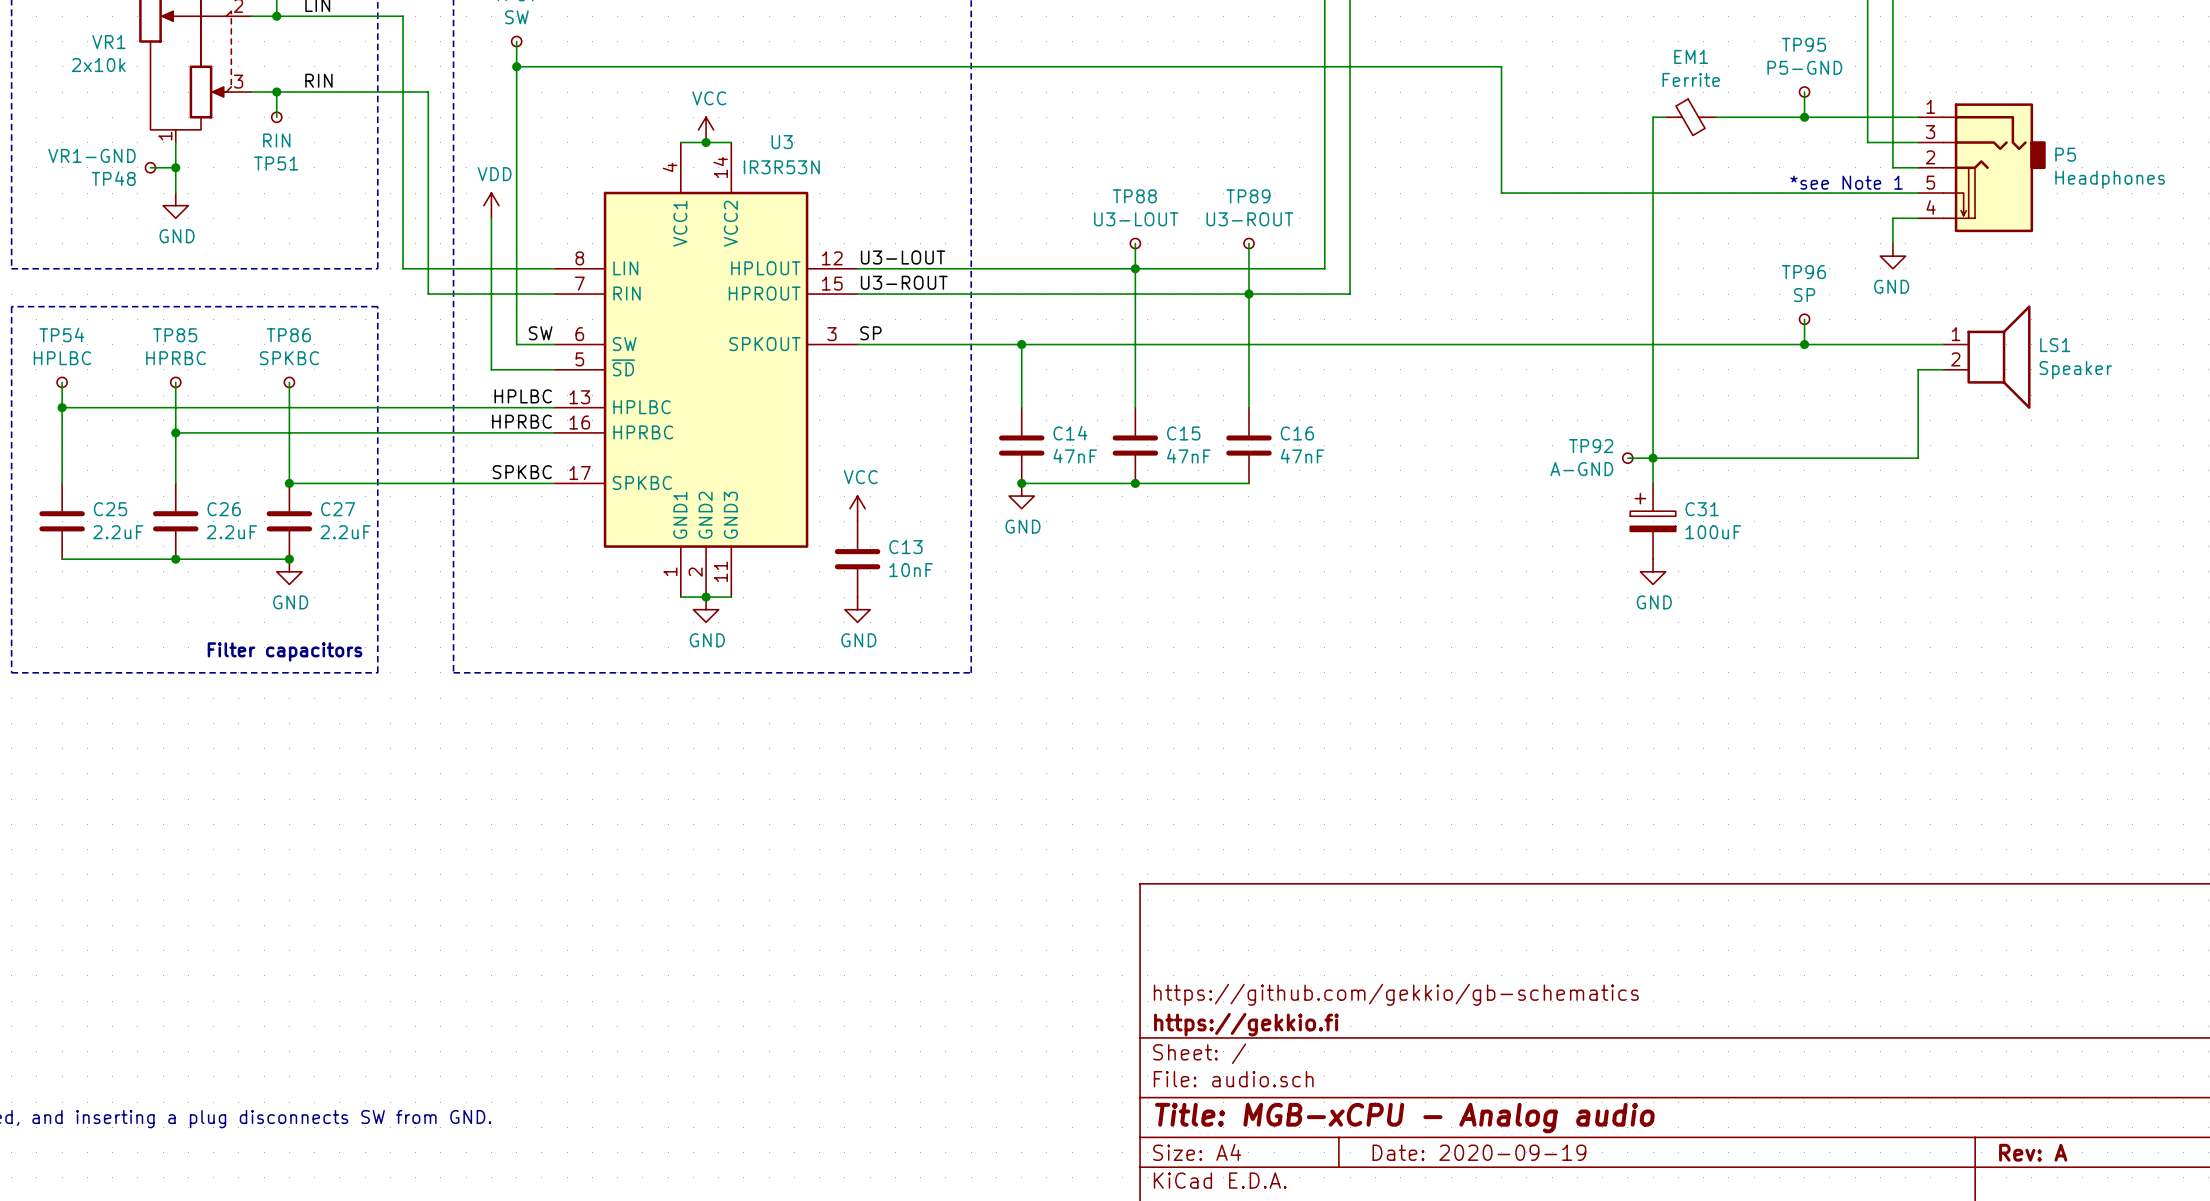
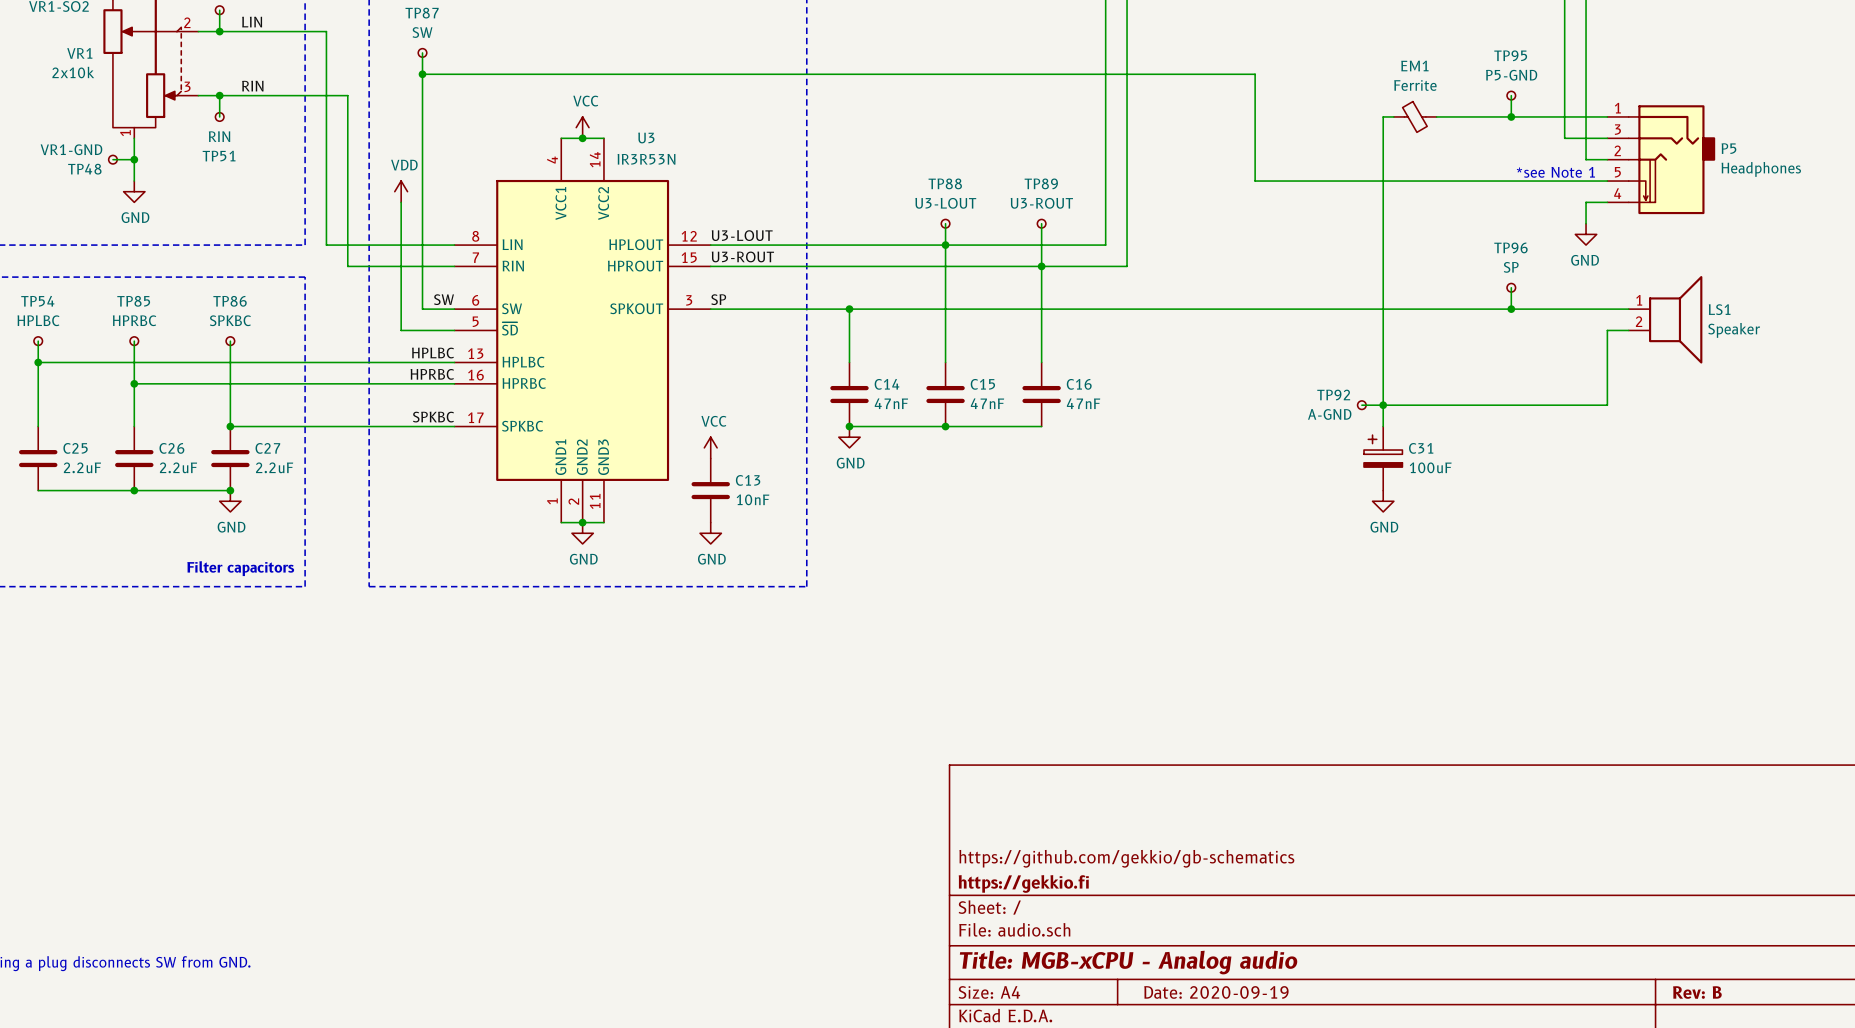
title block: Rev: A (2033, 1152) -> Rev: B (1697, 992)

